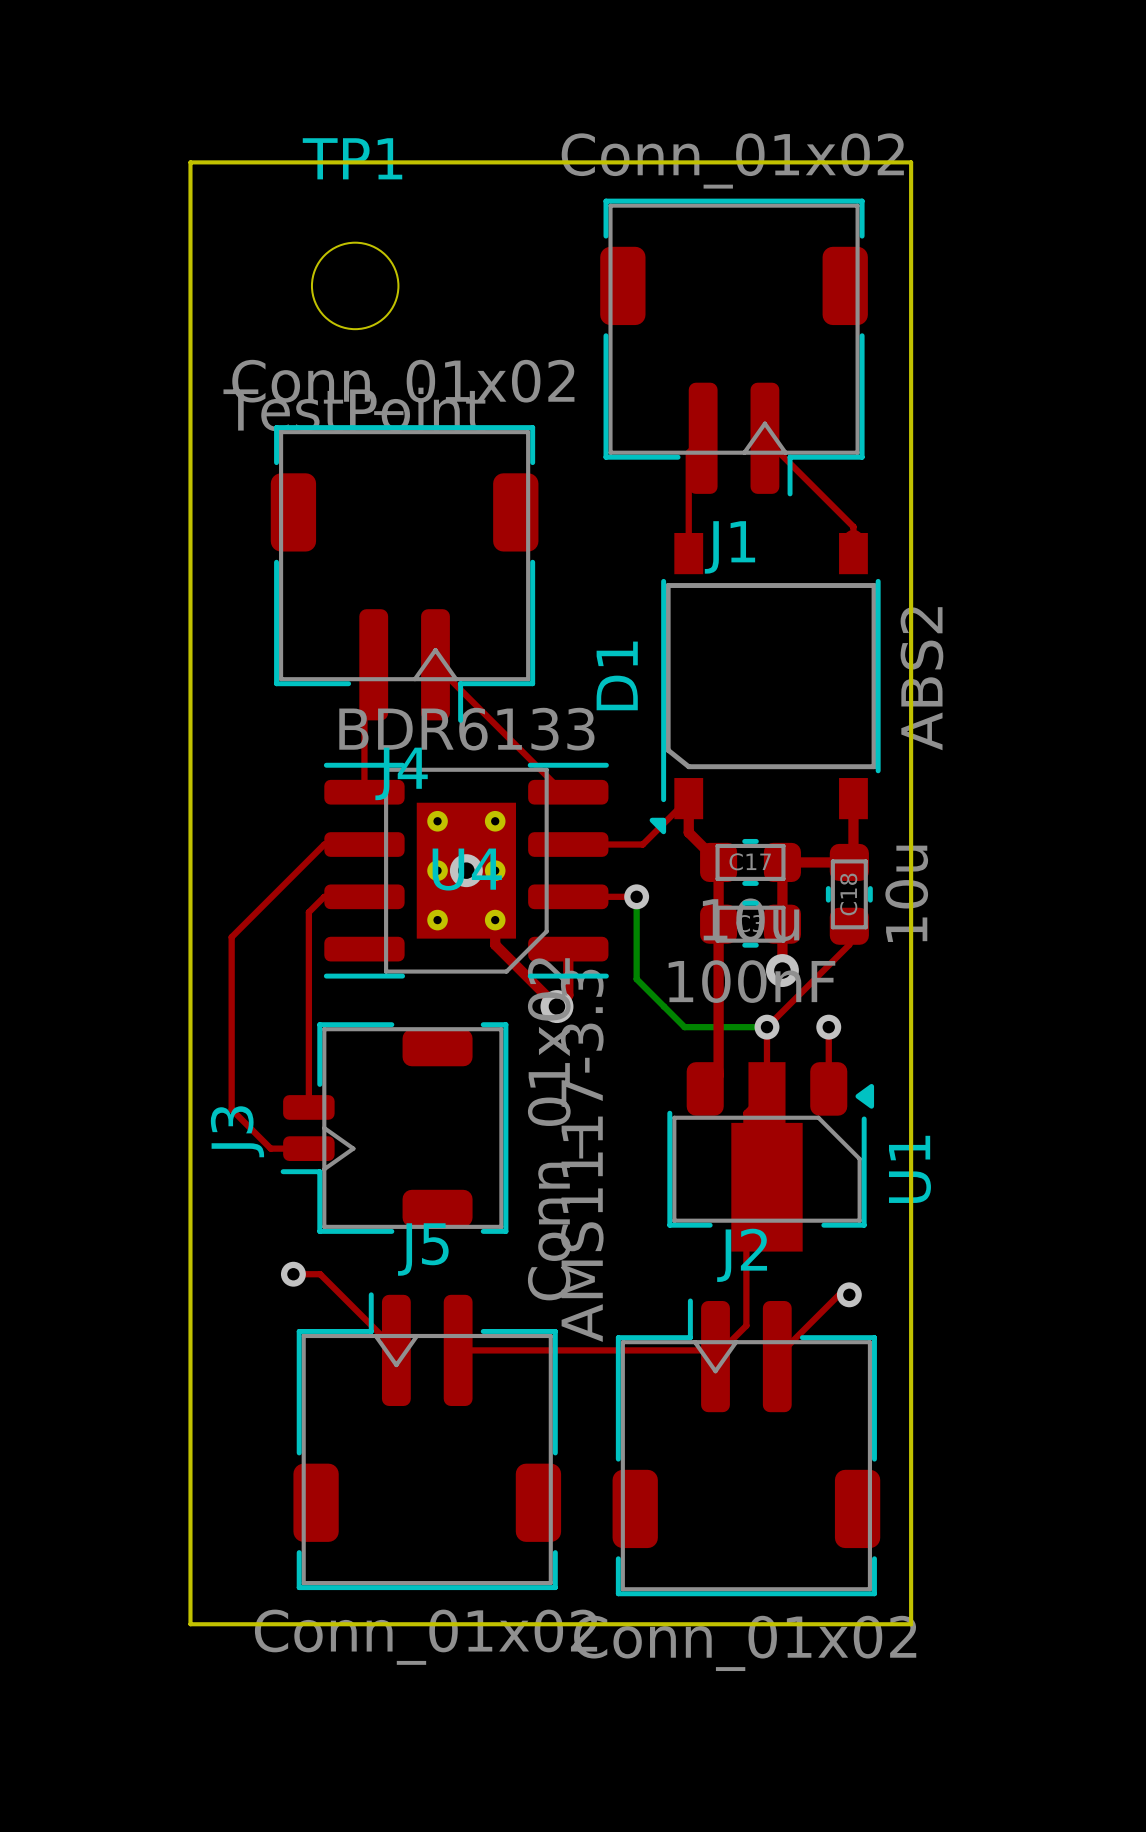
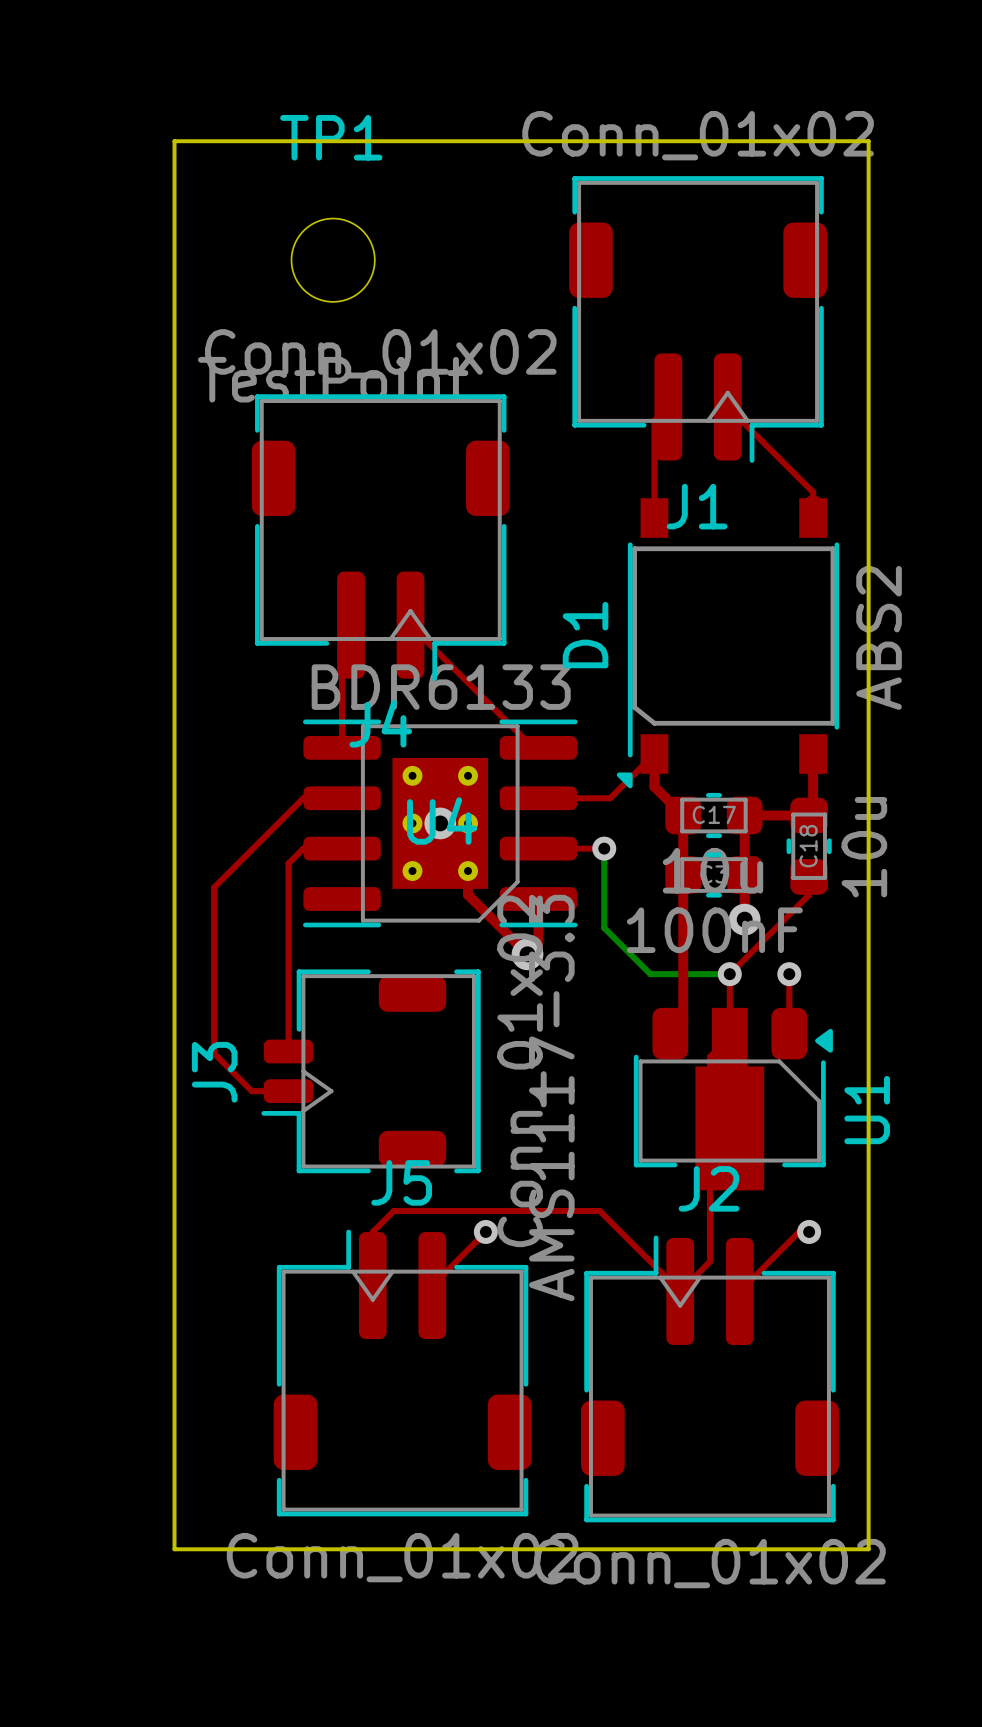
top track: (293, 1274) (320, 1274) (396, 1350) -> none
via position: (293, 1274) -> (485, 1231)
top track: none -> (485, 1231) (432, 1285)
top track: (458, 1350) (709, 1350) -> (372, 1285) (372, 1231) (393, 1210) (599, 1210) (674, 1285)

